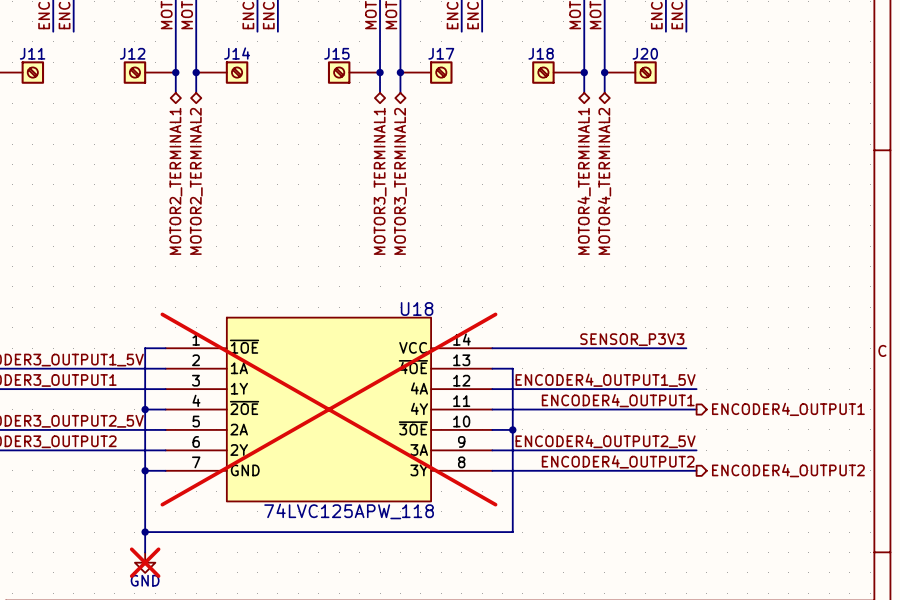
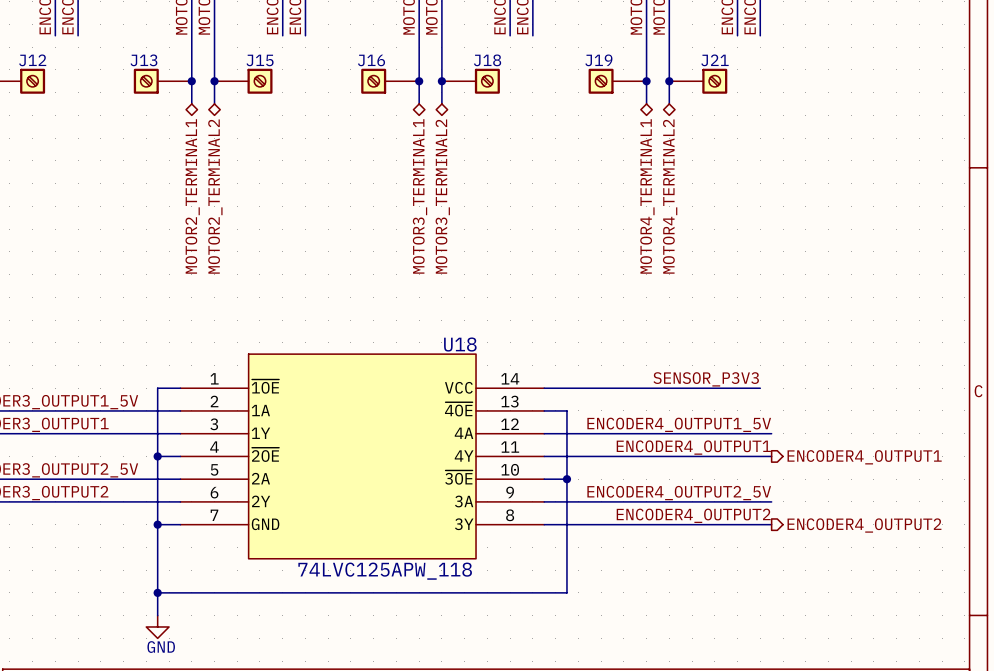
J11 name: J11 (32, 53) -> J12 (32, 60)
J12 name: J12 (132, 53) -> J13 (143, 60)
J14 name: J14 (237, 53) -> J15 (260, 60)
J15 name: J15 (336, 53) -> J16 (371, 60)
J17 name: J17 (441, 53) -> J18 (487, 60)
J18 name: J18 (541, 53) -> J19 (598, 60)
J20 name: J20 (645, 53) -> J21 (715, 60)
U18 do-not-place cross: (328, 409) -> none
power symbol do-not-place cross: (145, 562) -> none

